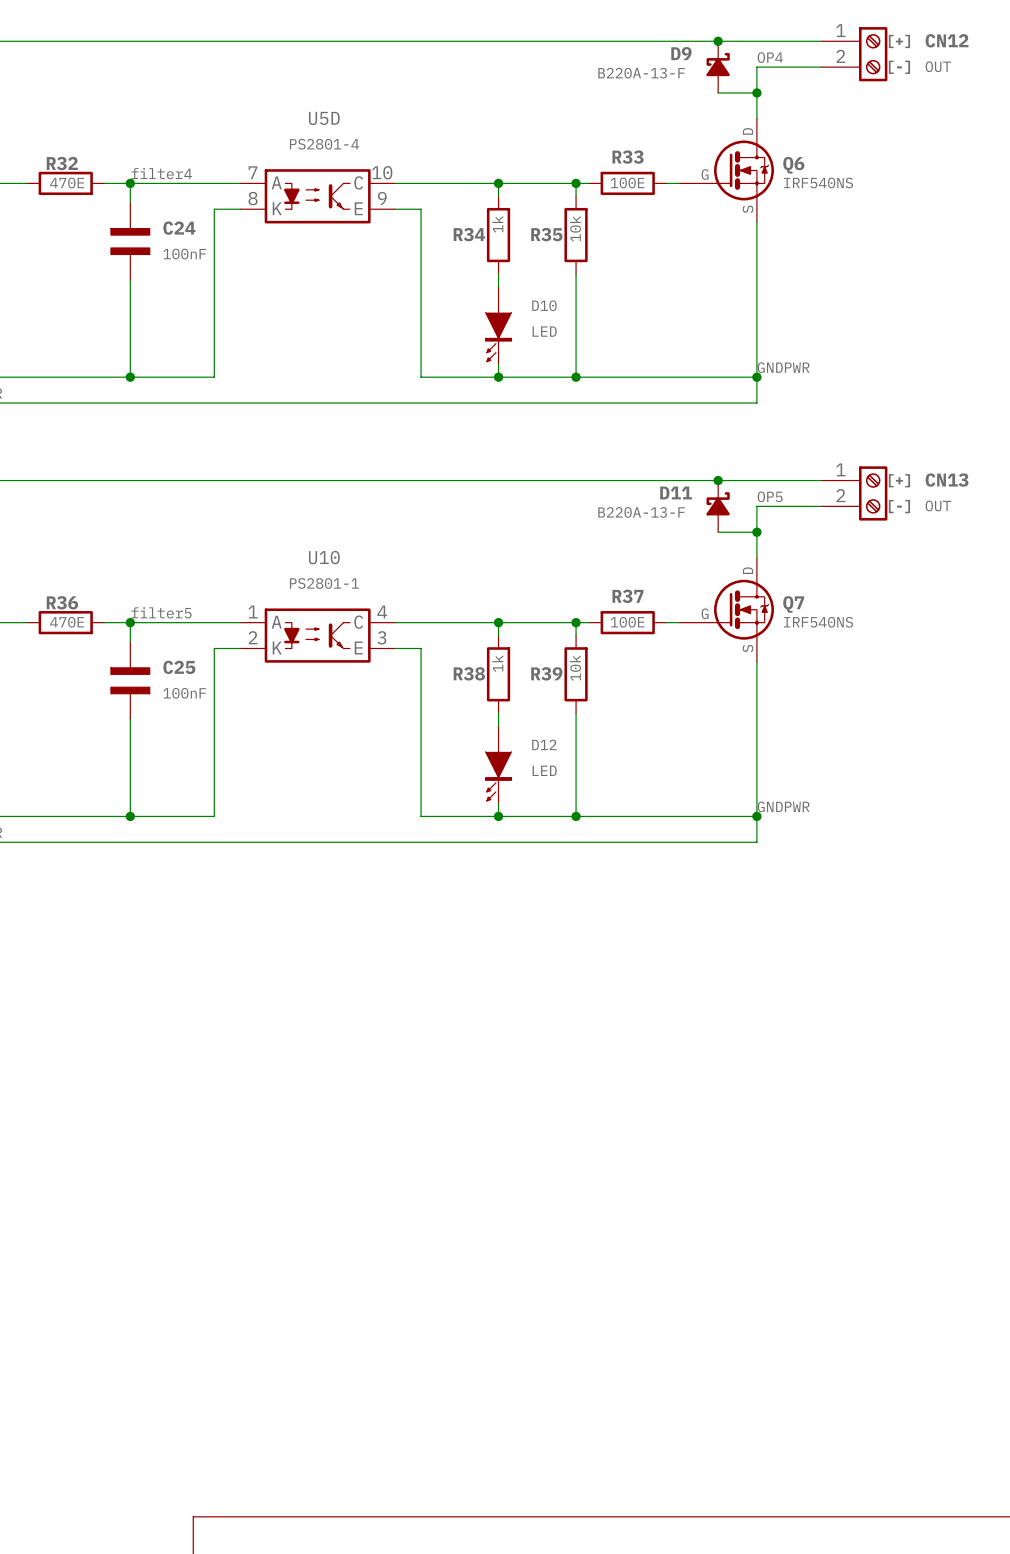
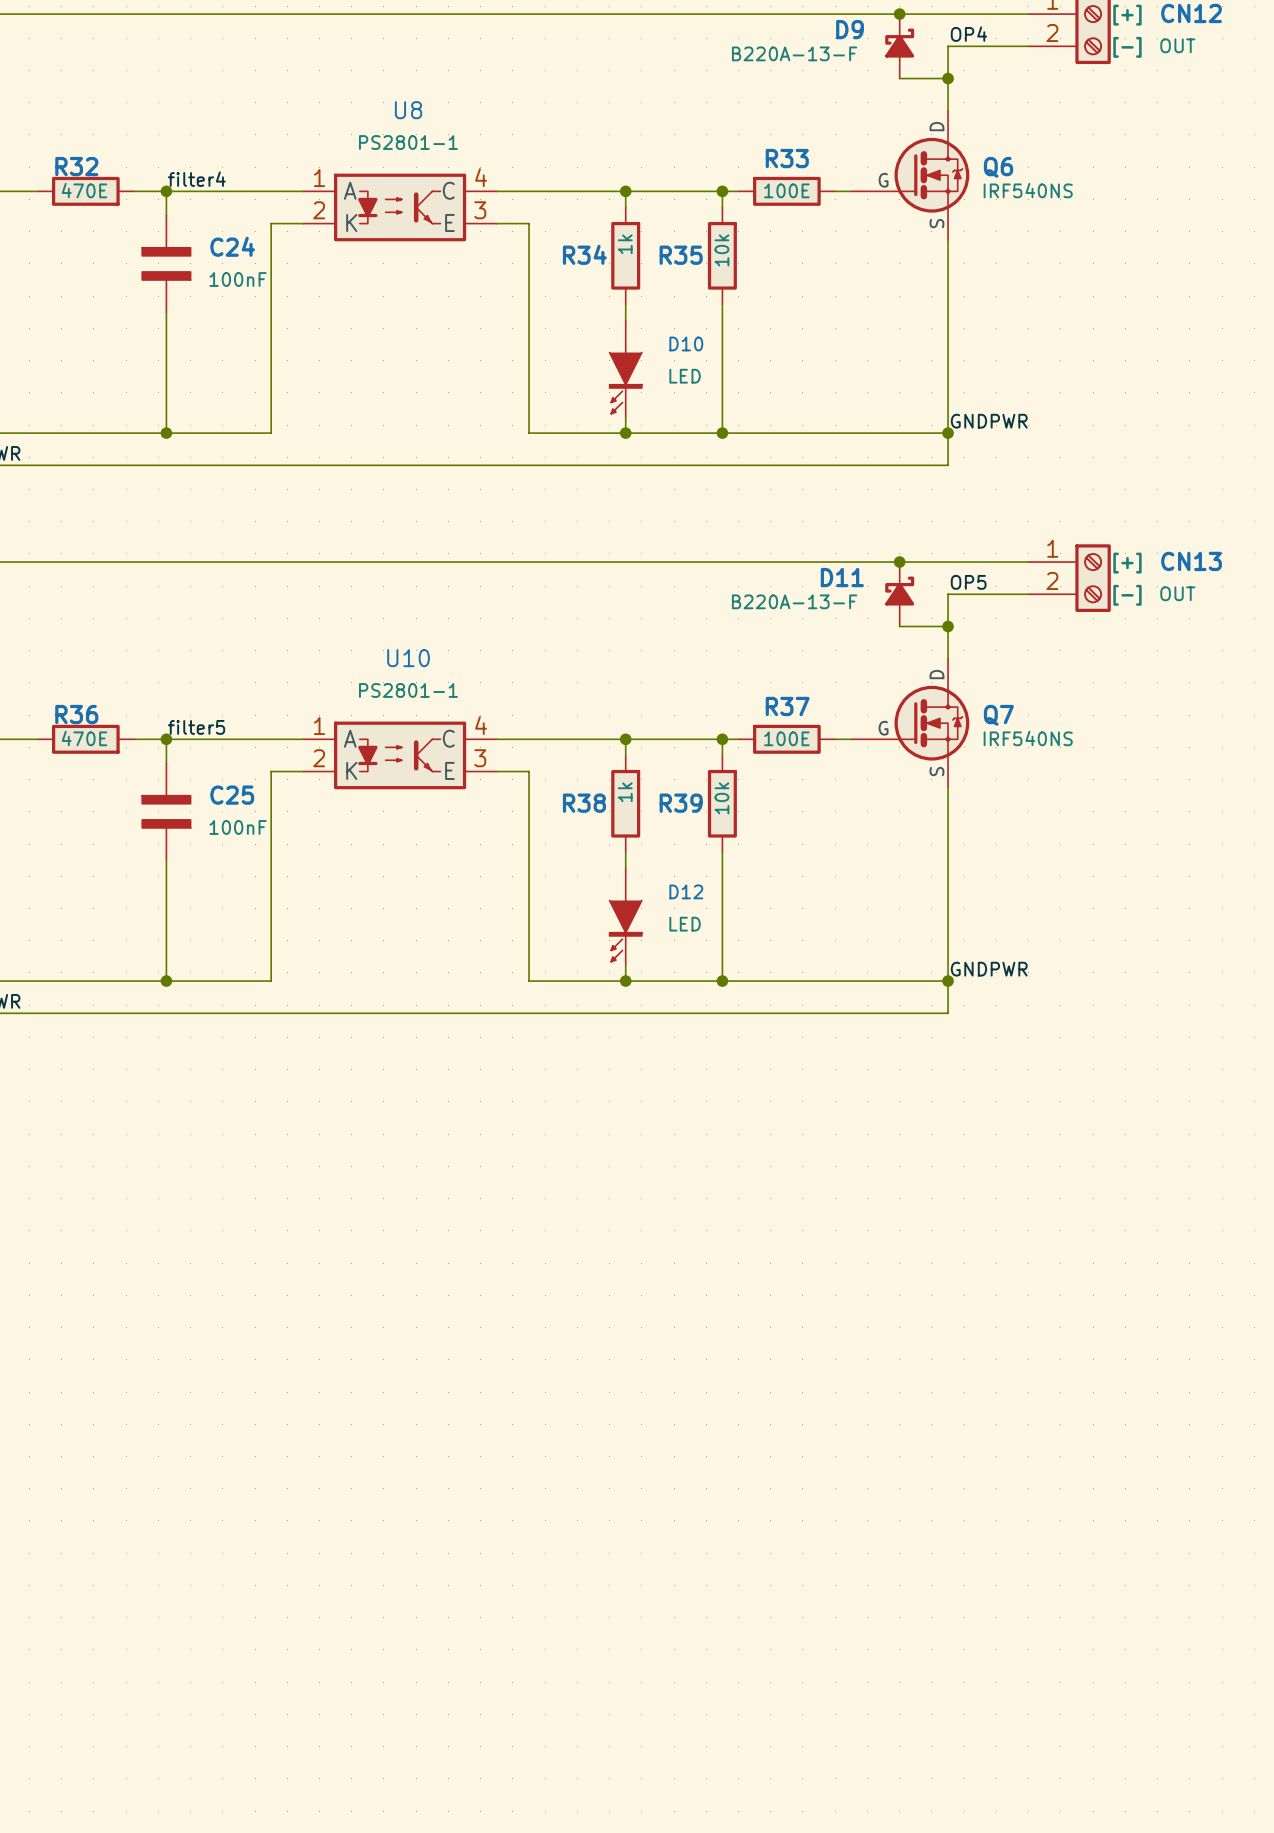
U5D name: U5D (324, 118) -> U8 (408, 110)
U5D value: PS2801-4 (324, 144) -> PS2801-1 (408, 142)
U5D pin number: 7 (253, 172) -> 1 (319, 178)
U5D pin number: 10 (382, 172) -> 4 (481, 177)
U5D pin number: 8 (253, 198) -> 2 (319, 210)
U5D pin number: 9 (382, 198) -> 3 (480, 210)

